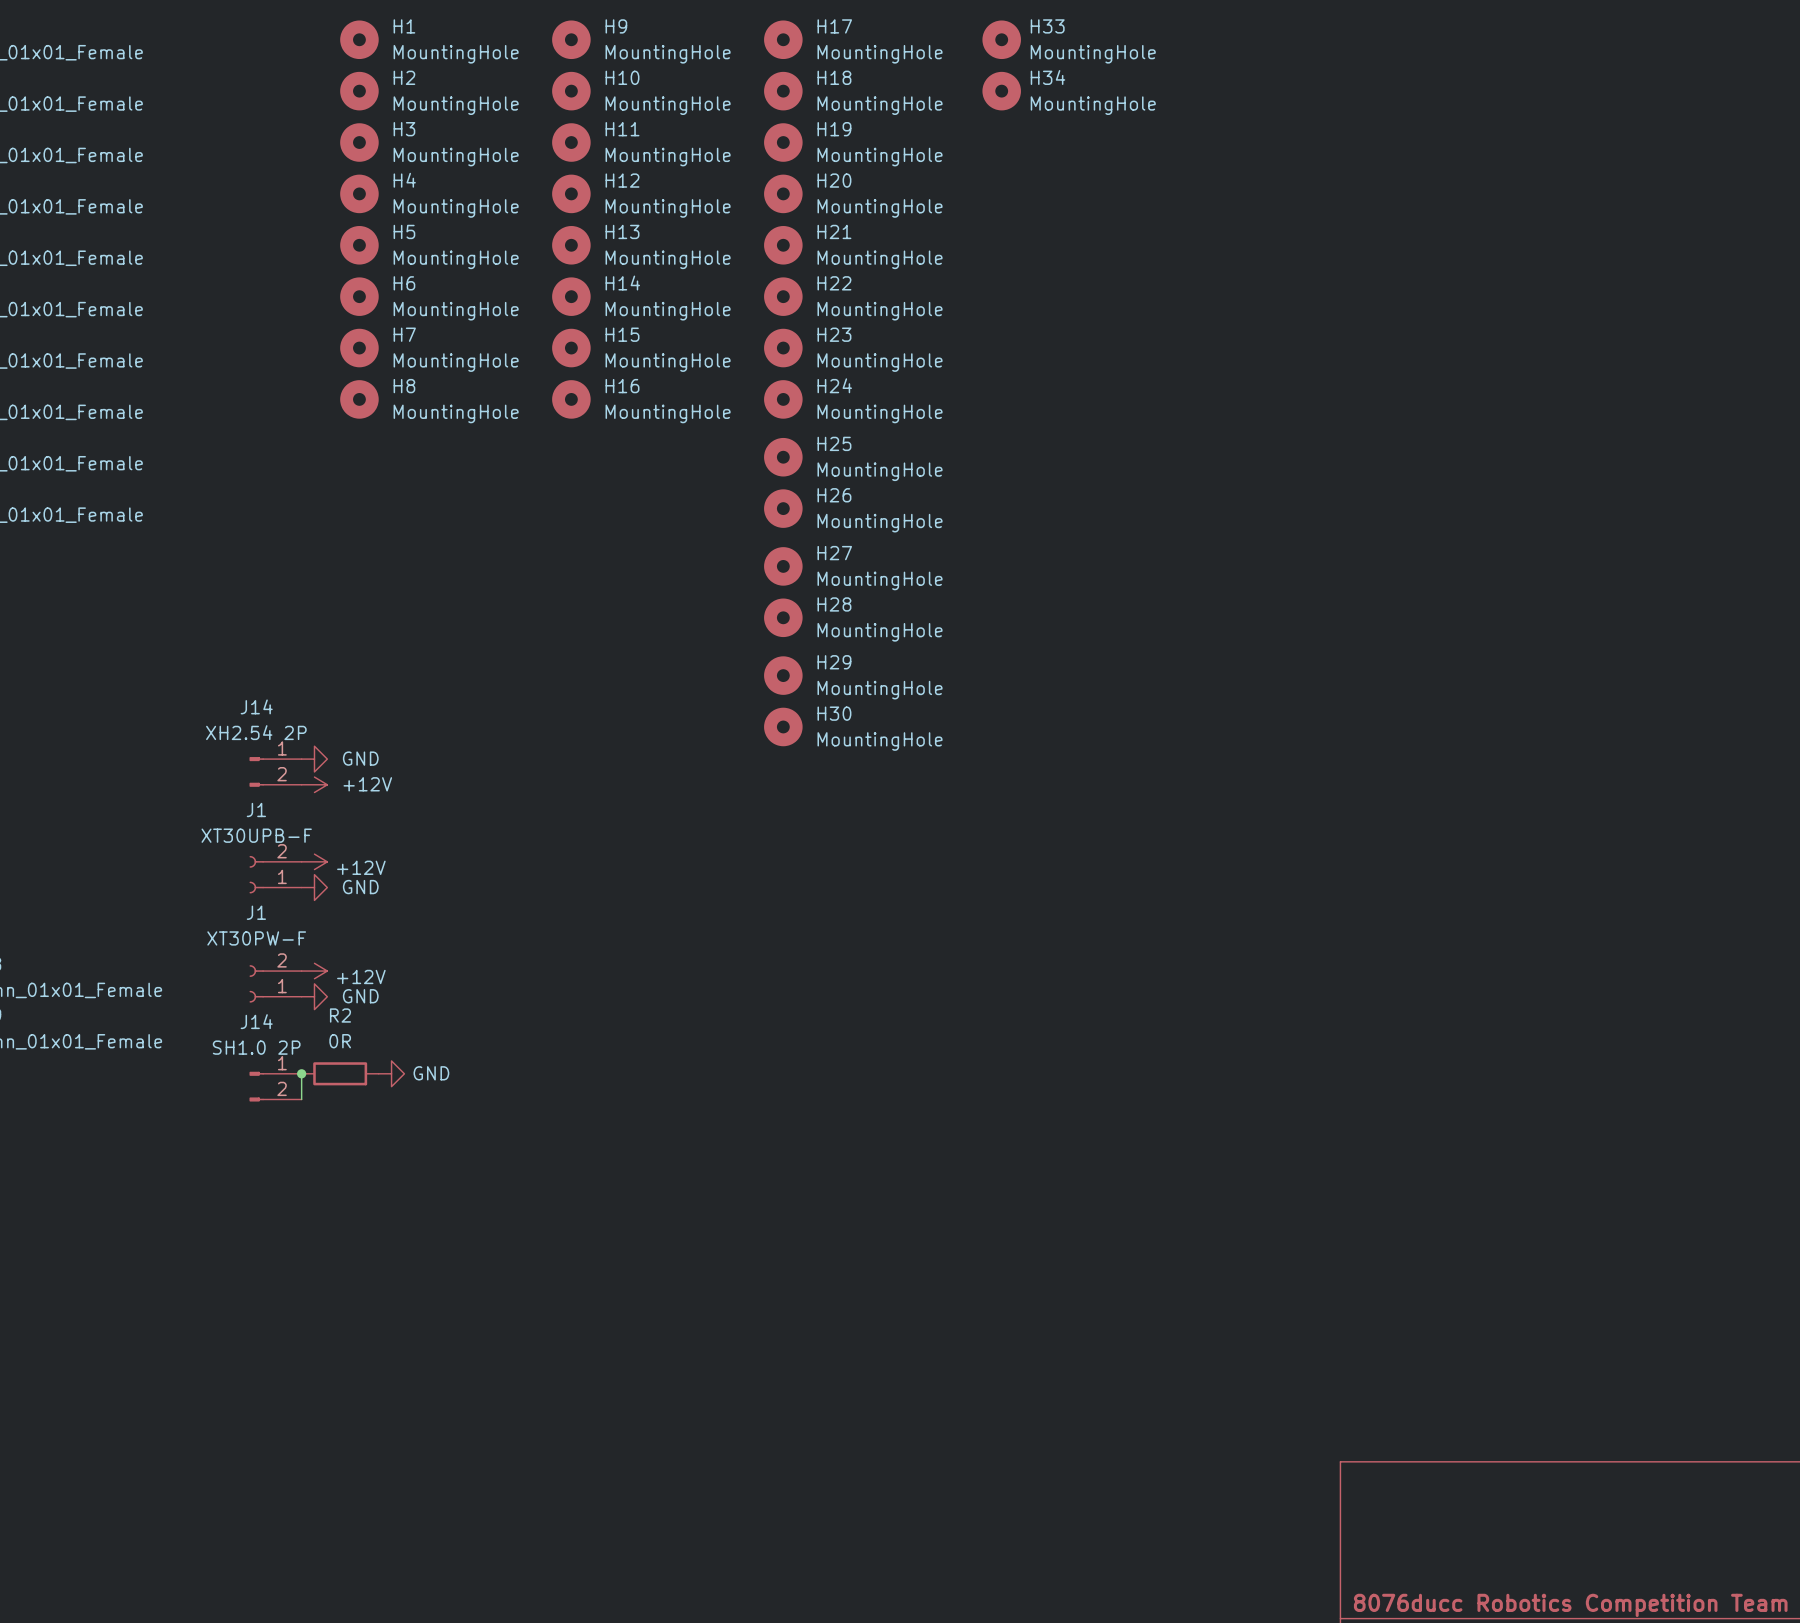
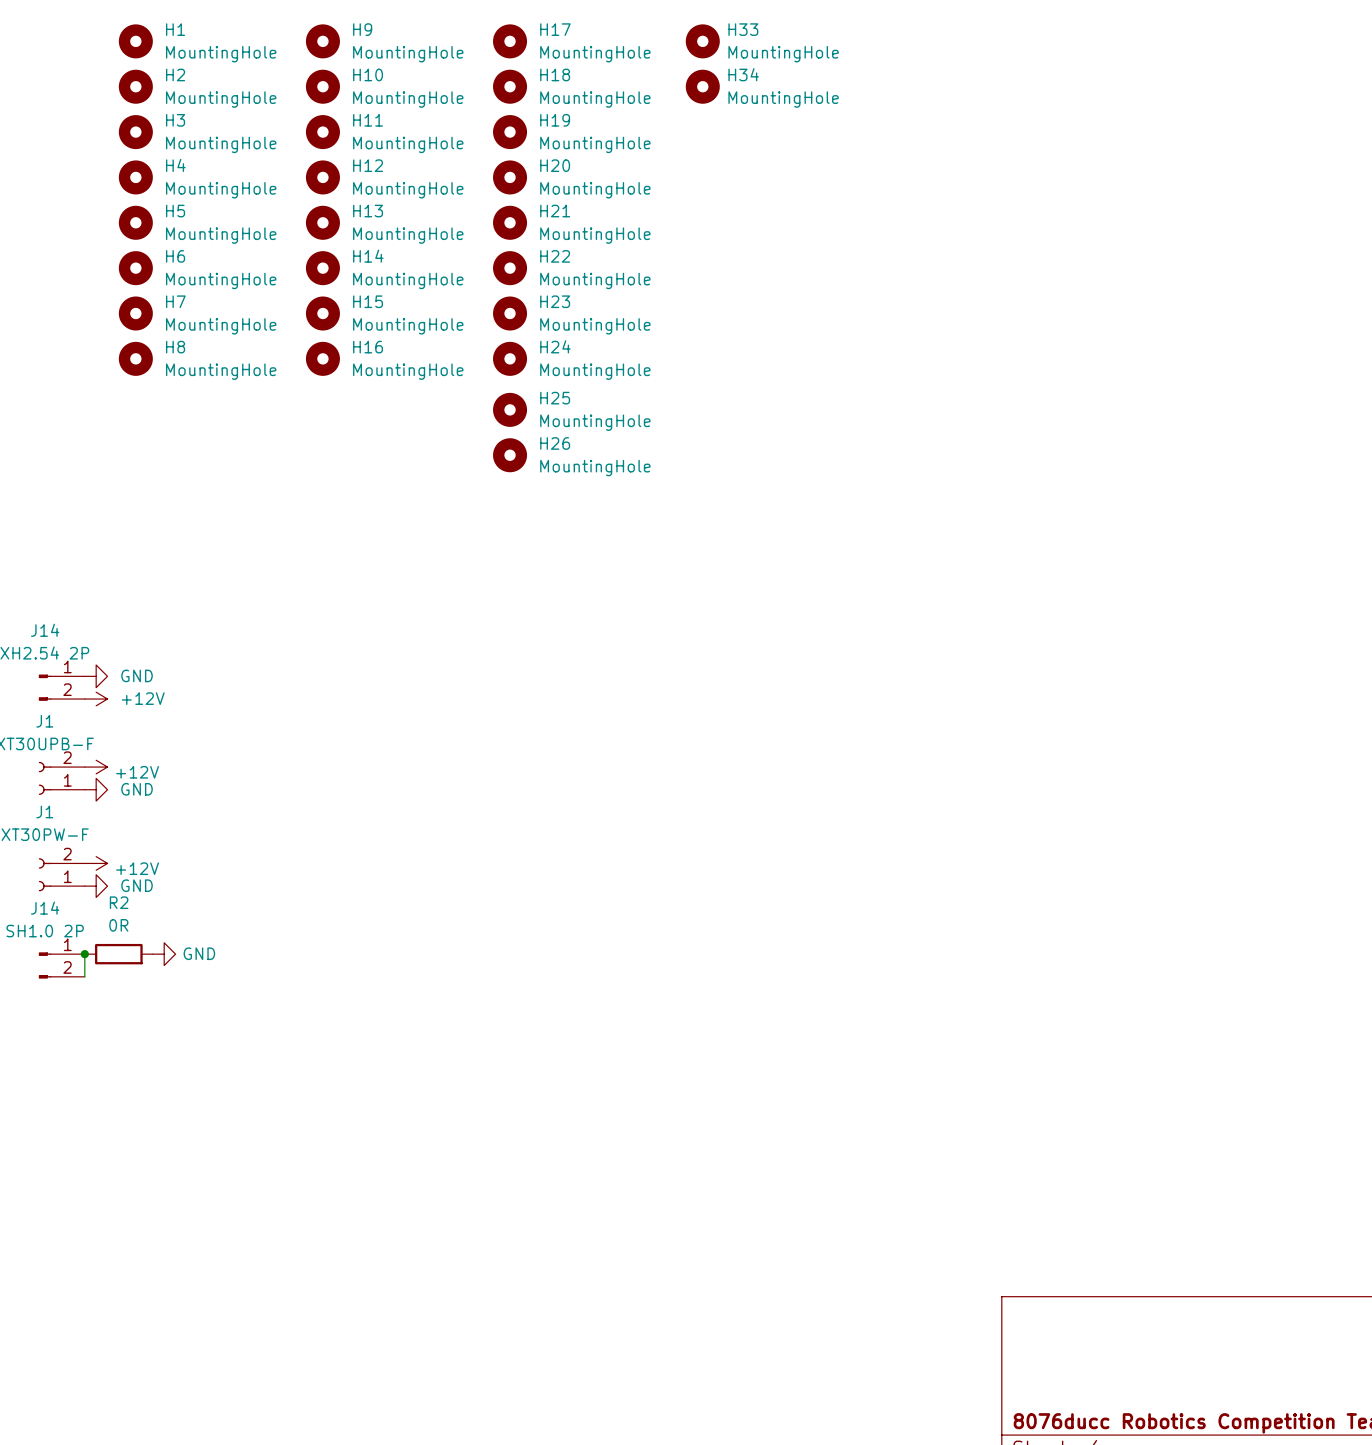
H27: MountingHole (783, 566) -> none
H28: MountingHole (783, 617) -> none
H29: MountingHole (783, 675) -> none
H30: MountingHole (783, 726) -> none

